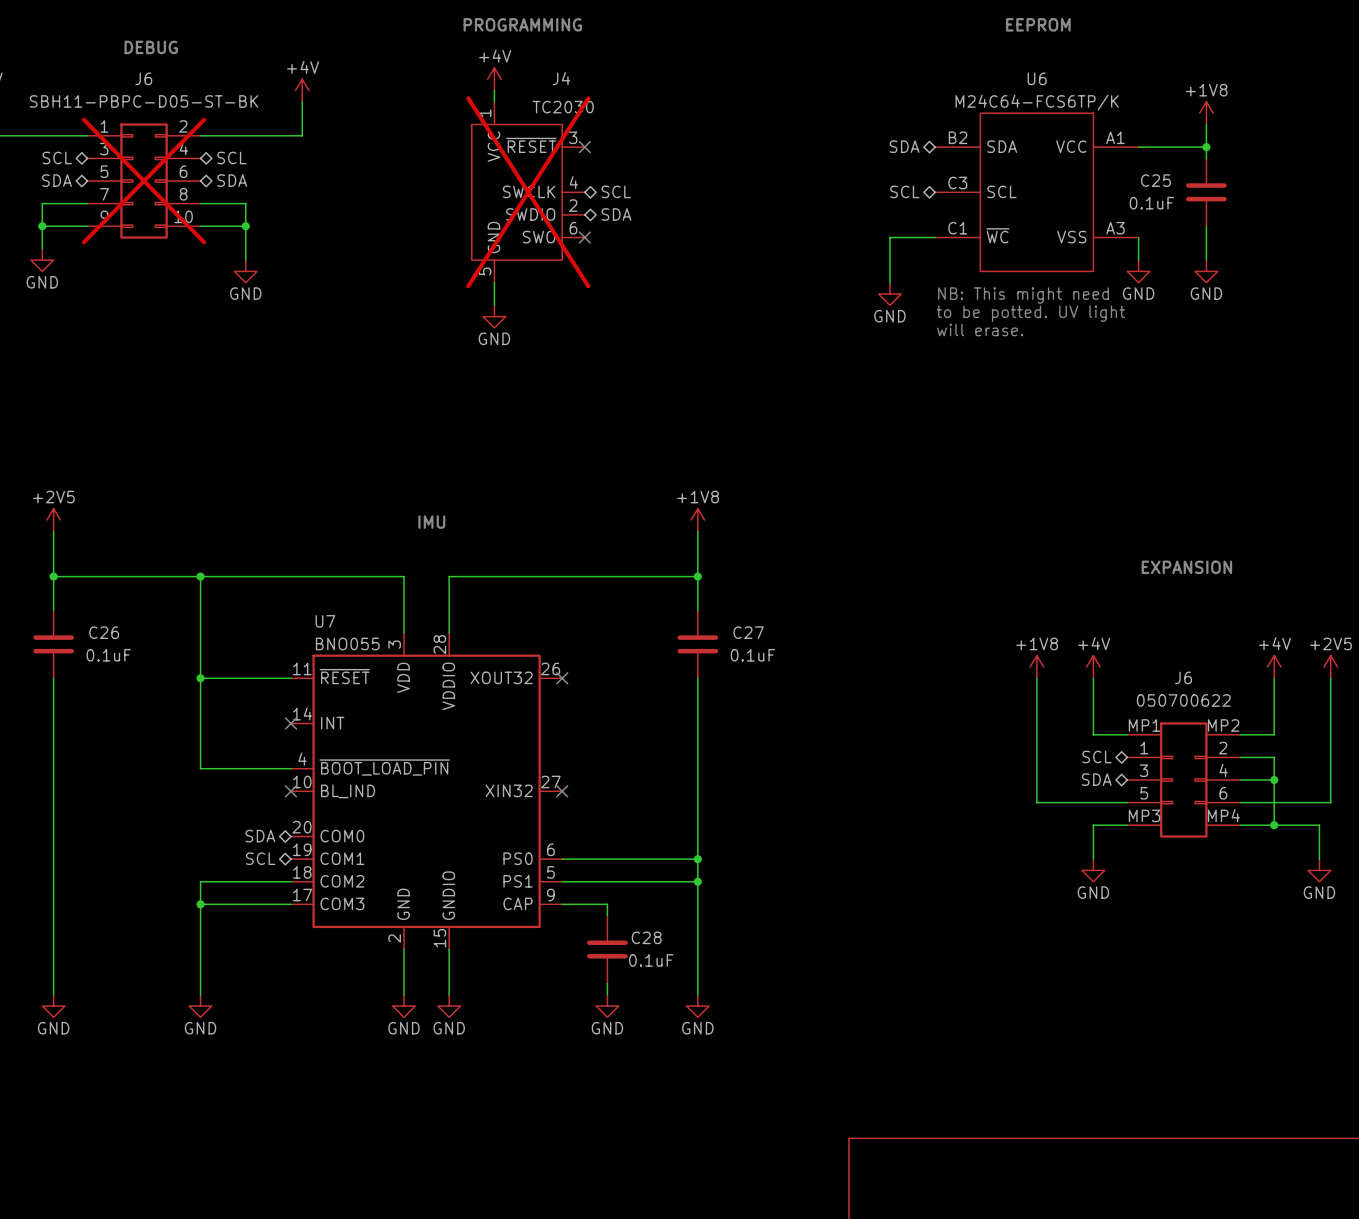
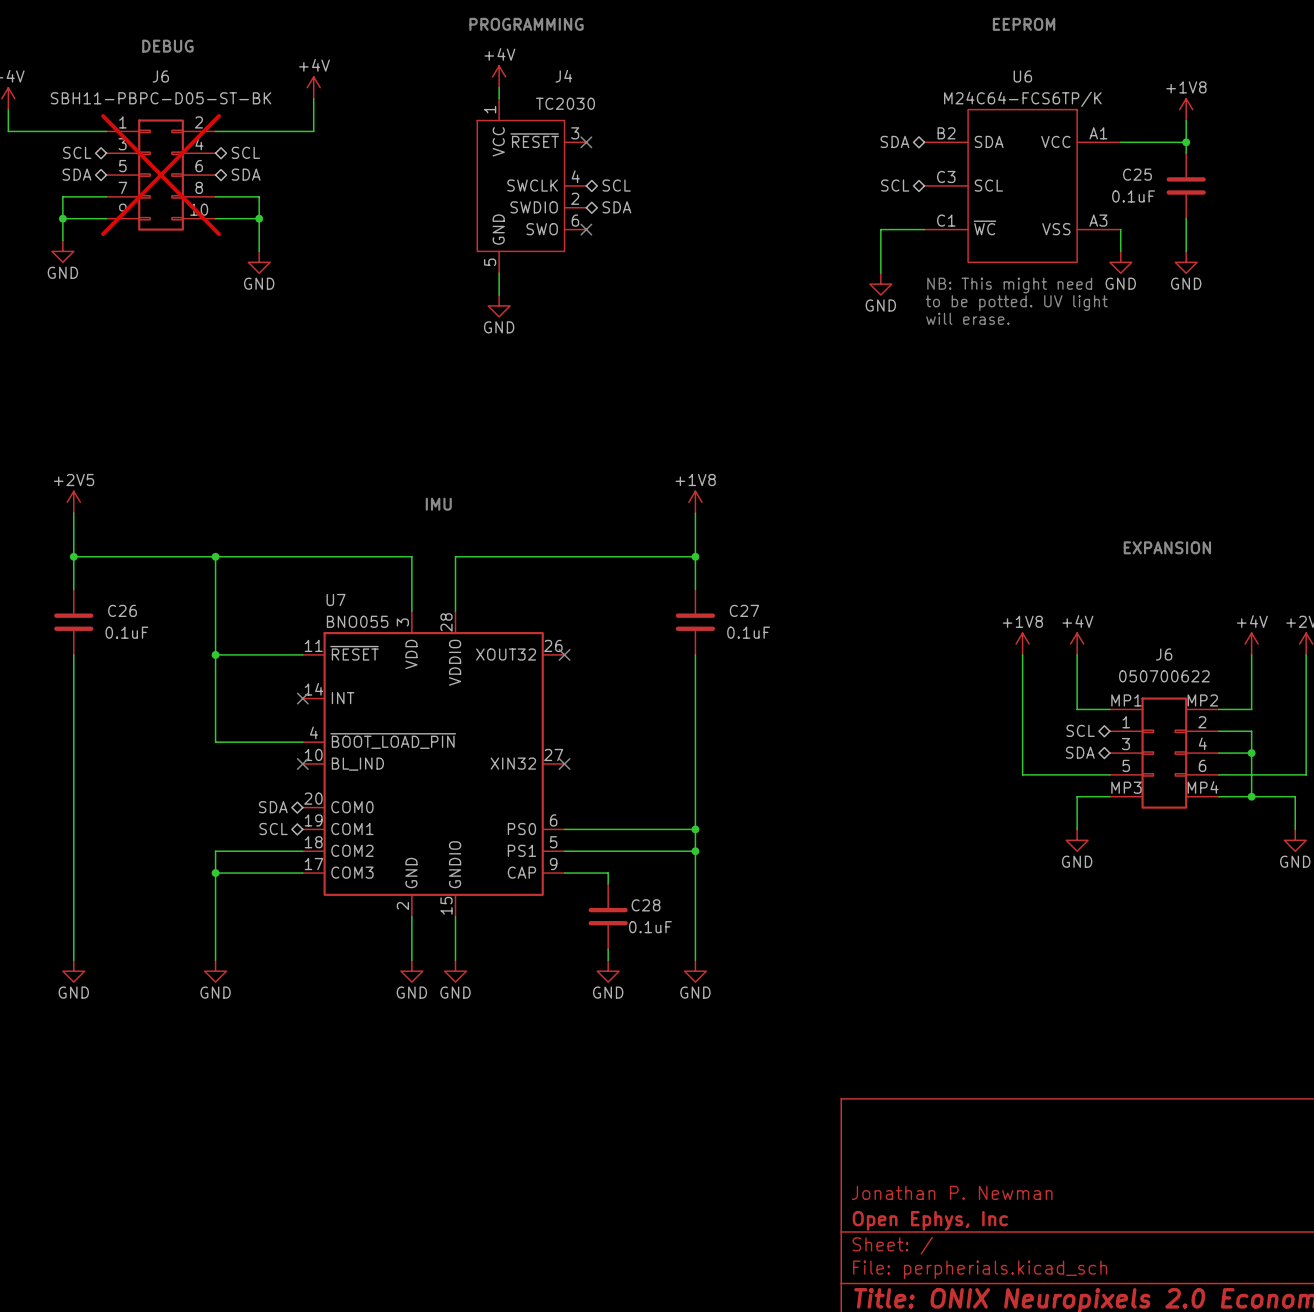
J4 do-not-place cross: (528, 192) -> none

